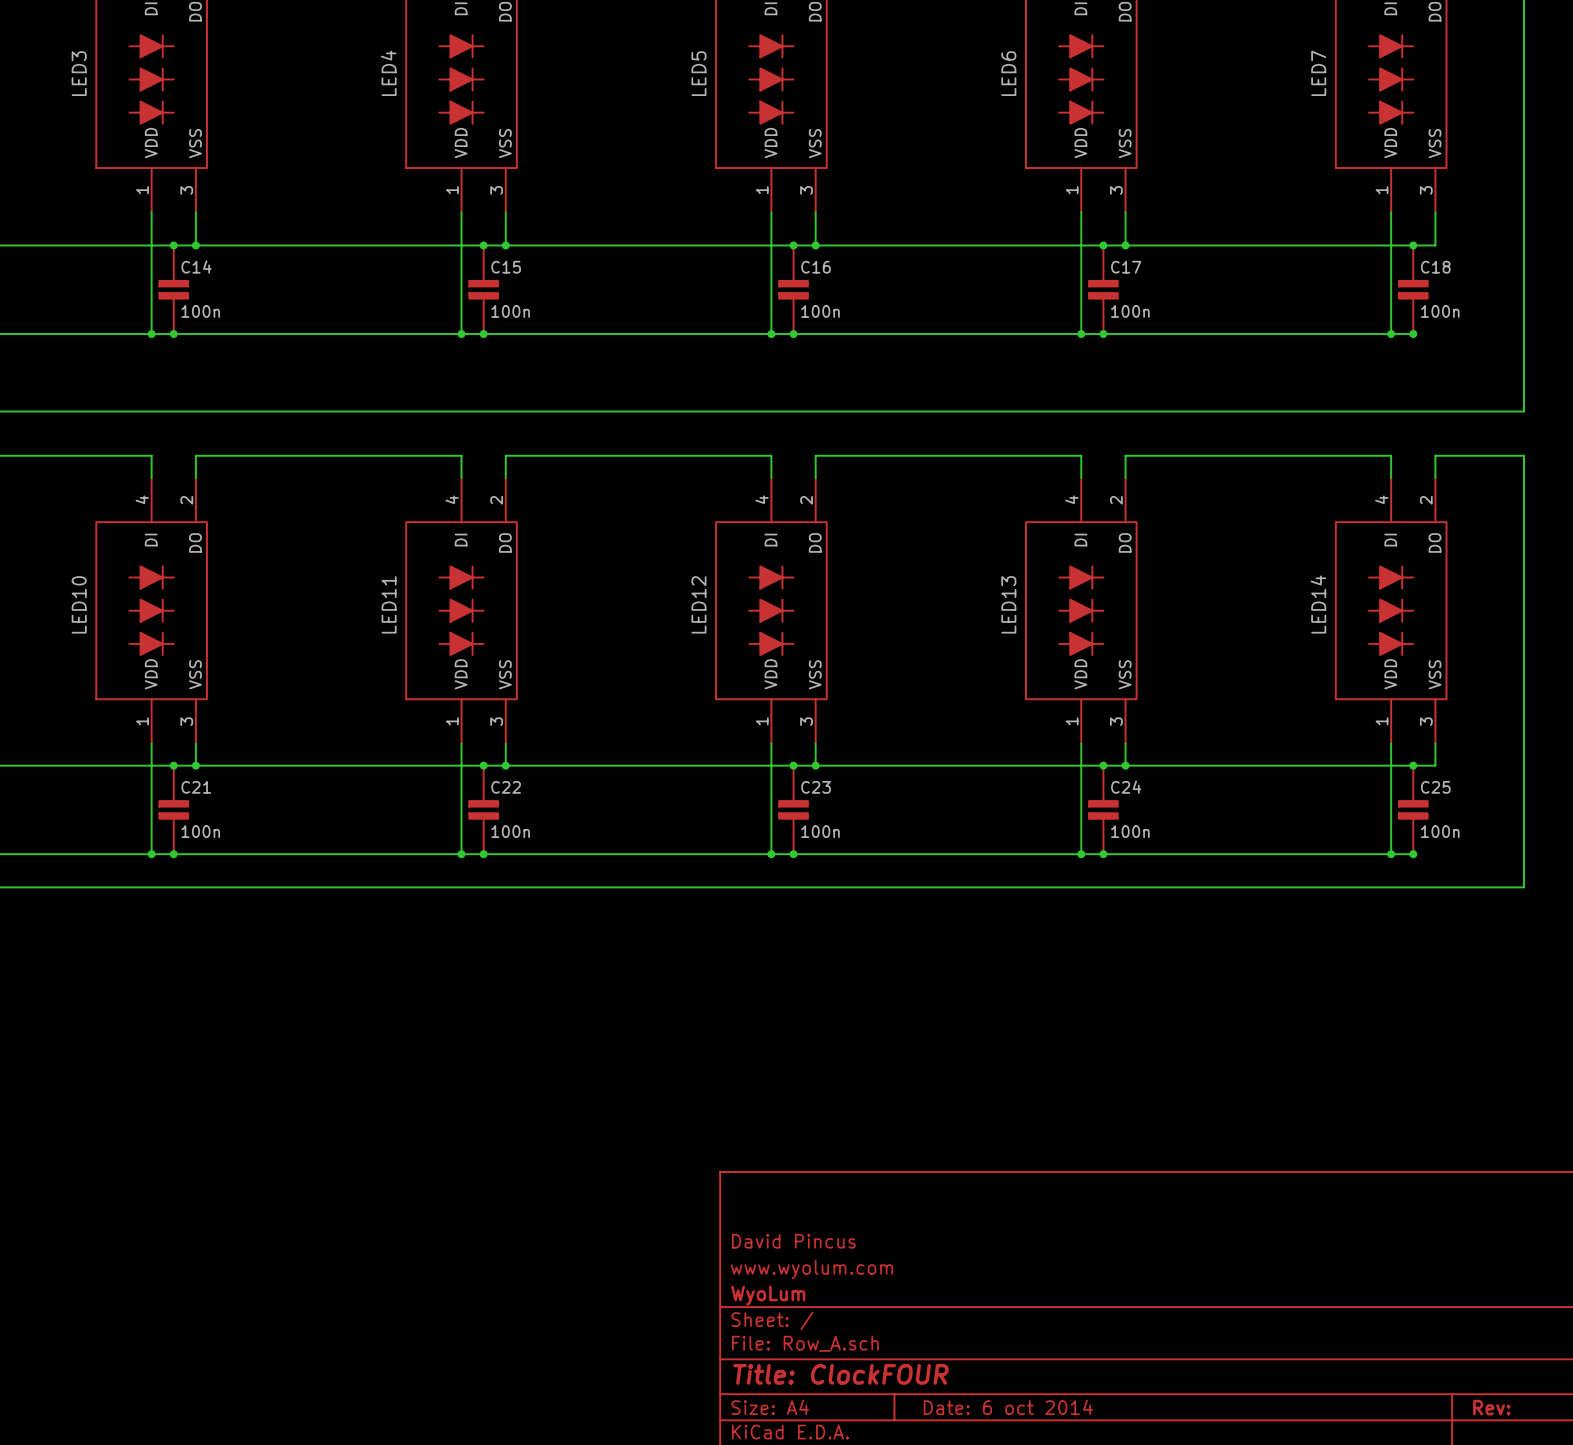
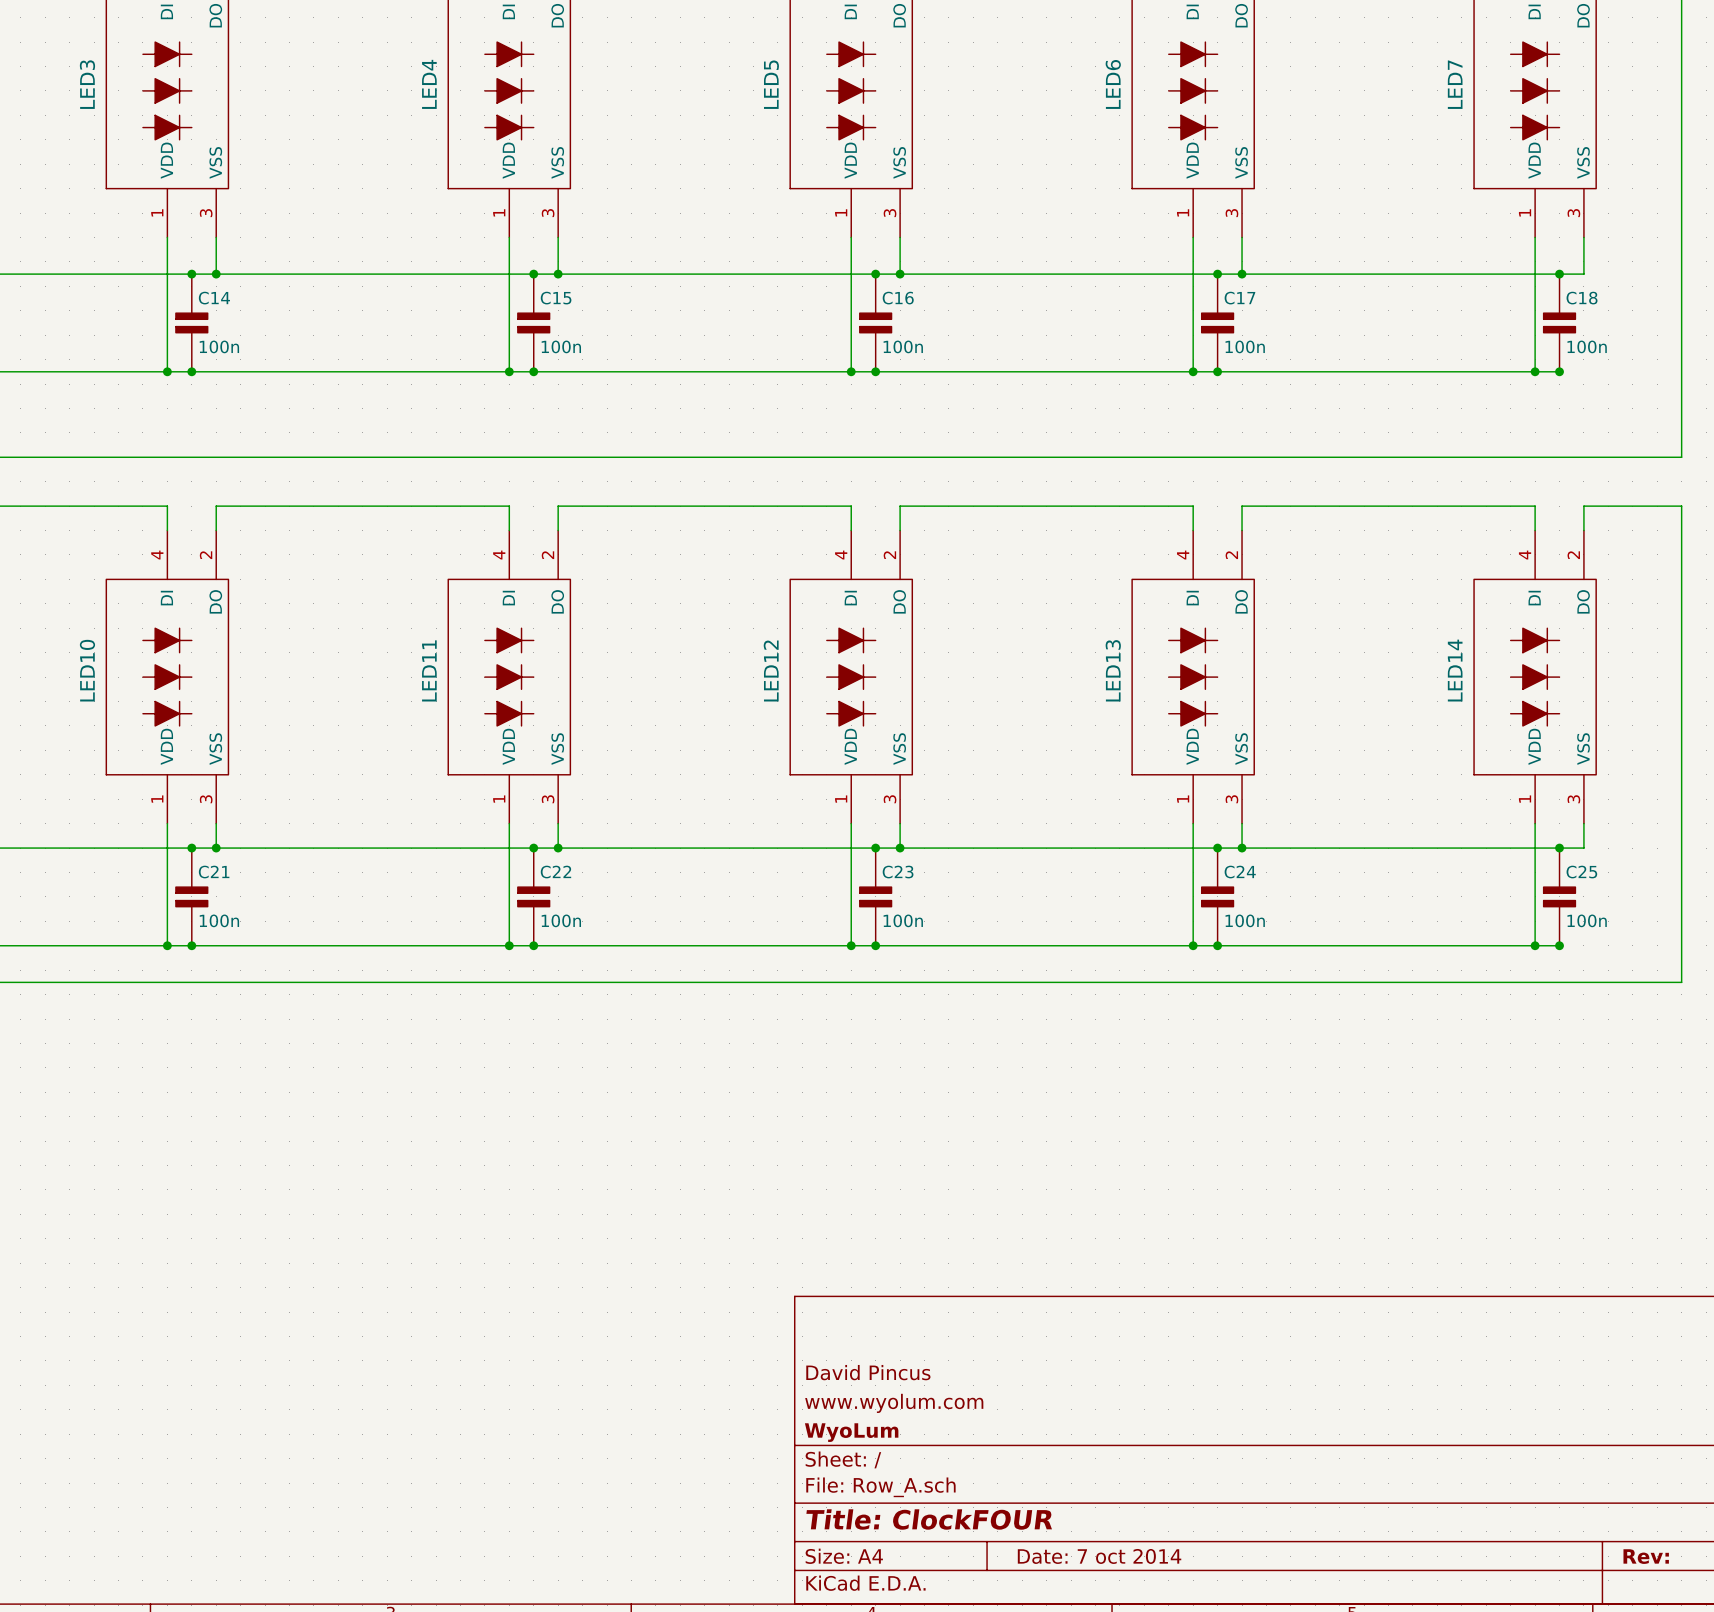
title block: Date: 6 oct 2014 (1008, 1407) -> Date: 7 oct 2014 (1099, 1556)

